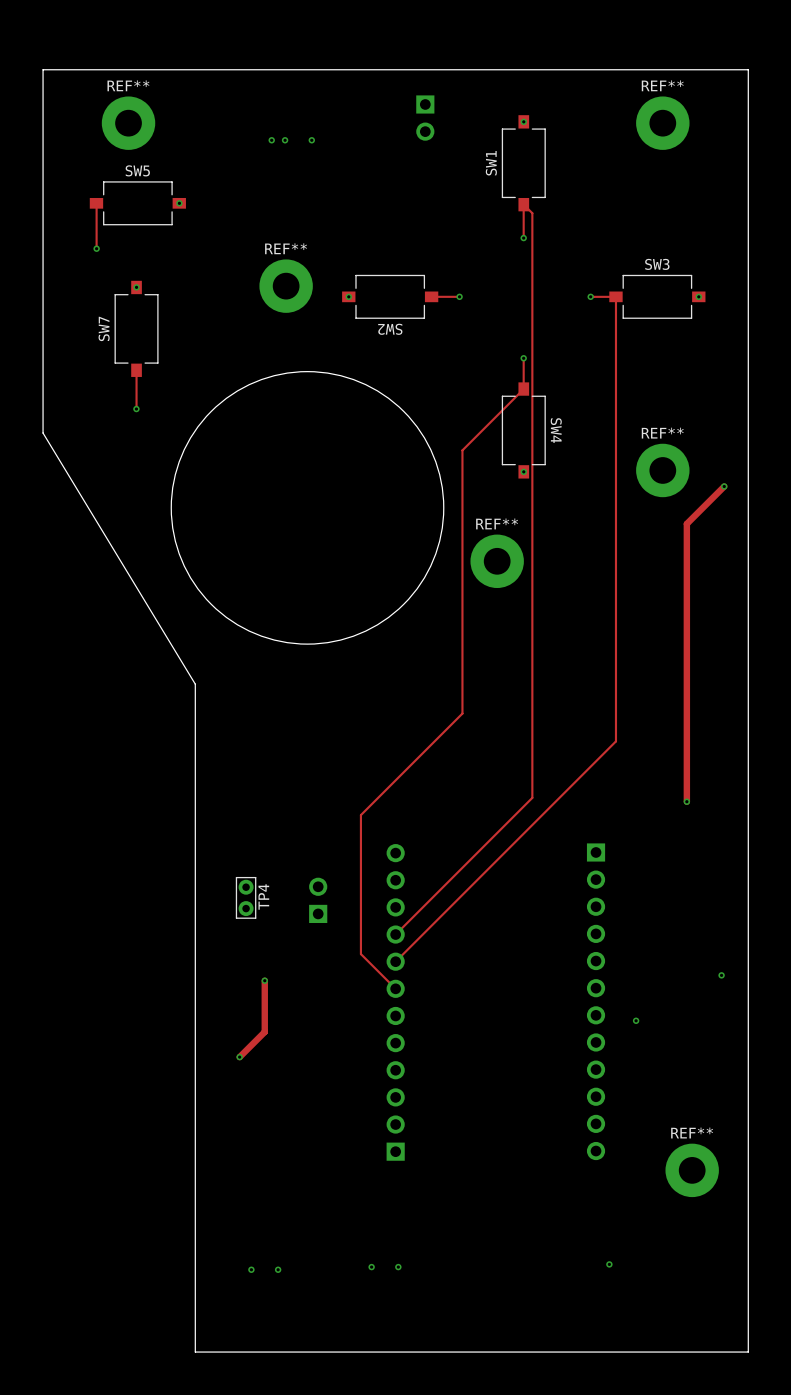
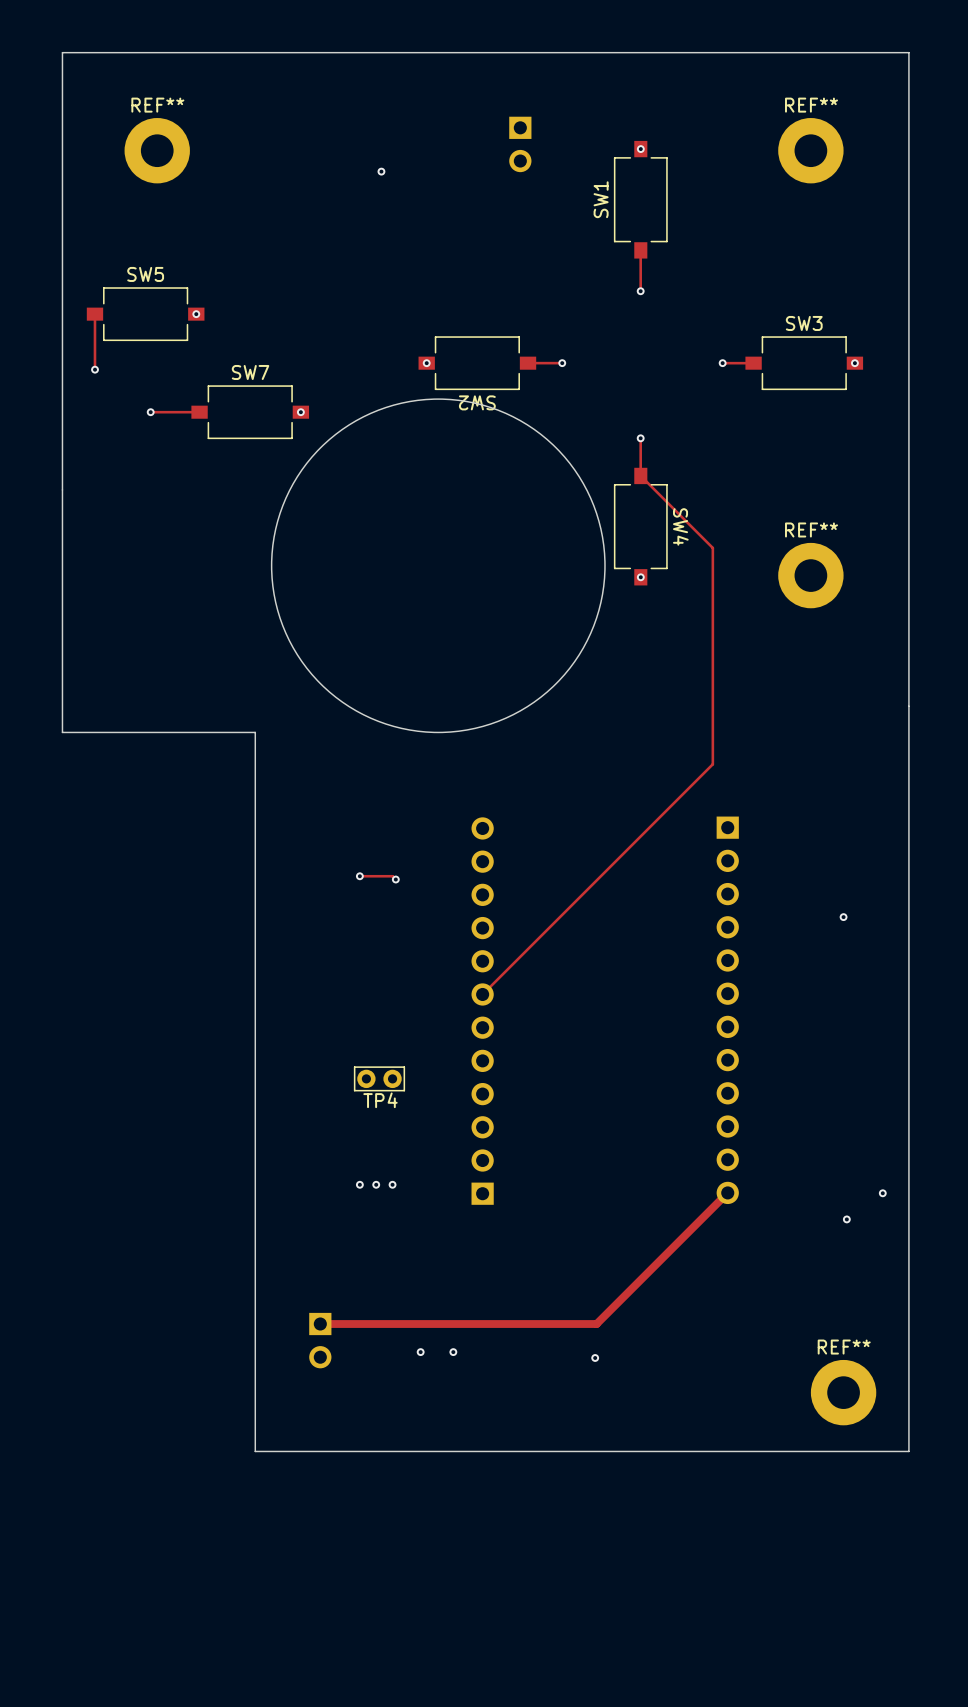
board edge: (43, 69) (748, 69) (748, 1352) (195, 1352) (195, 684) (43, 433) (43, 69) -> (62, 52) (62, 732) (255, 732) (255, 1451) (908, 1451) (908, 52) (62, 52)
via: (271, 140) -> none
via: (285, 140) -> none
track: (96, 203) (96, 248) -> (94, 314) (94, 369)
SW5 position: (137, 203) -> (145, 314)
via: (179, 203) -> none
track: (523, 204) (532, 213) (532, 797) (395, 934) -> none
via: (96, 248) -> none
via: none -> (196, 314)
REF**: (286, 286) -> none
via: (136, 287) -> none
track: (615, 296) (615, 741) (395, 961) -> none
via: none -> (95, 369)
SW7 rotation: 0° (136, 328) -> 90° clockwise (250, 412)
SW7 position: (136, 328) -> (250, 412)
track: none -> (150, 412) (199, 412)
via: none -> (150, 412)
via: none -> (300, 412)
track: (136, 370) (136, 408) -> none
track: (523, 389) (462, 450) (462, 713) (360, 815) (360, 954) (395, 988) -> (640, 475) (712, 547) (712, 764) (482, 994)
via: (136, 409) -> none
track: (724, 486) (686, 523) (686, 801) -> none
via: (724, 486) -> none
round board edge position: (307, 507) -> (438, 565)
REF**: (497, 561) -> none
track: none -> (359, 876) (392, 876) (395, 879)
via: none -> (359, 876)
via: none -> (395, 879)
via position: (686, 801) -> (843, 917)
part: none -> (727, 1010)
part: none -> (482, 1011)
TP4 rotation: 0° (246, 897) -> 90° clockwise (379, 1078)
TP4 position: (246, 897) -> (379, 1078)
part rotation: 0° (318, 900) -> 180° (320, 1340)
part position: (318, 900) -> (320, 1340)
via: none -> (359, 1184)
via: none -> (376, 1184)
via: none -> (392, 1184)
track: none -> (727, 1192) (596, 1324) (320, 1324)
track: (264, 980) (264, 1032) (239, 1057) -> none
via: (264, 980) -> none
part: (596, 1001) -> none
part: (395, 1002) -> none
via position: (636, 1020) -> (846, 1219)
via: (239, 1057) -> none
via: none -> (420, 1352)
via: none -> (453, 1352)
via: none -> (595, 1357)
REF** position: (692, 1170) -> (843, 1392)
via: (609, 1264) -> none
via: (371, 1267) -> none
via: (398, 1267) -> none
via: (251, 1269) -> none
via: (278, 1269) -> none

